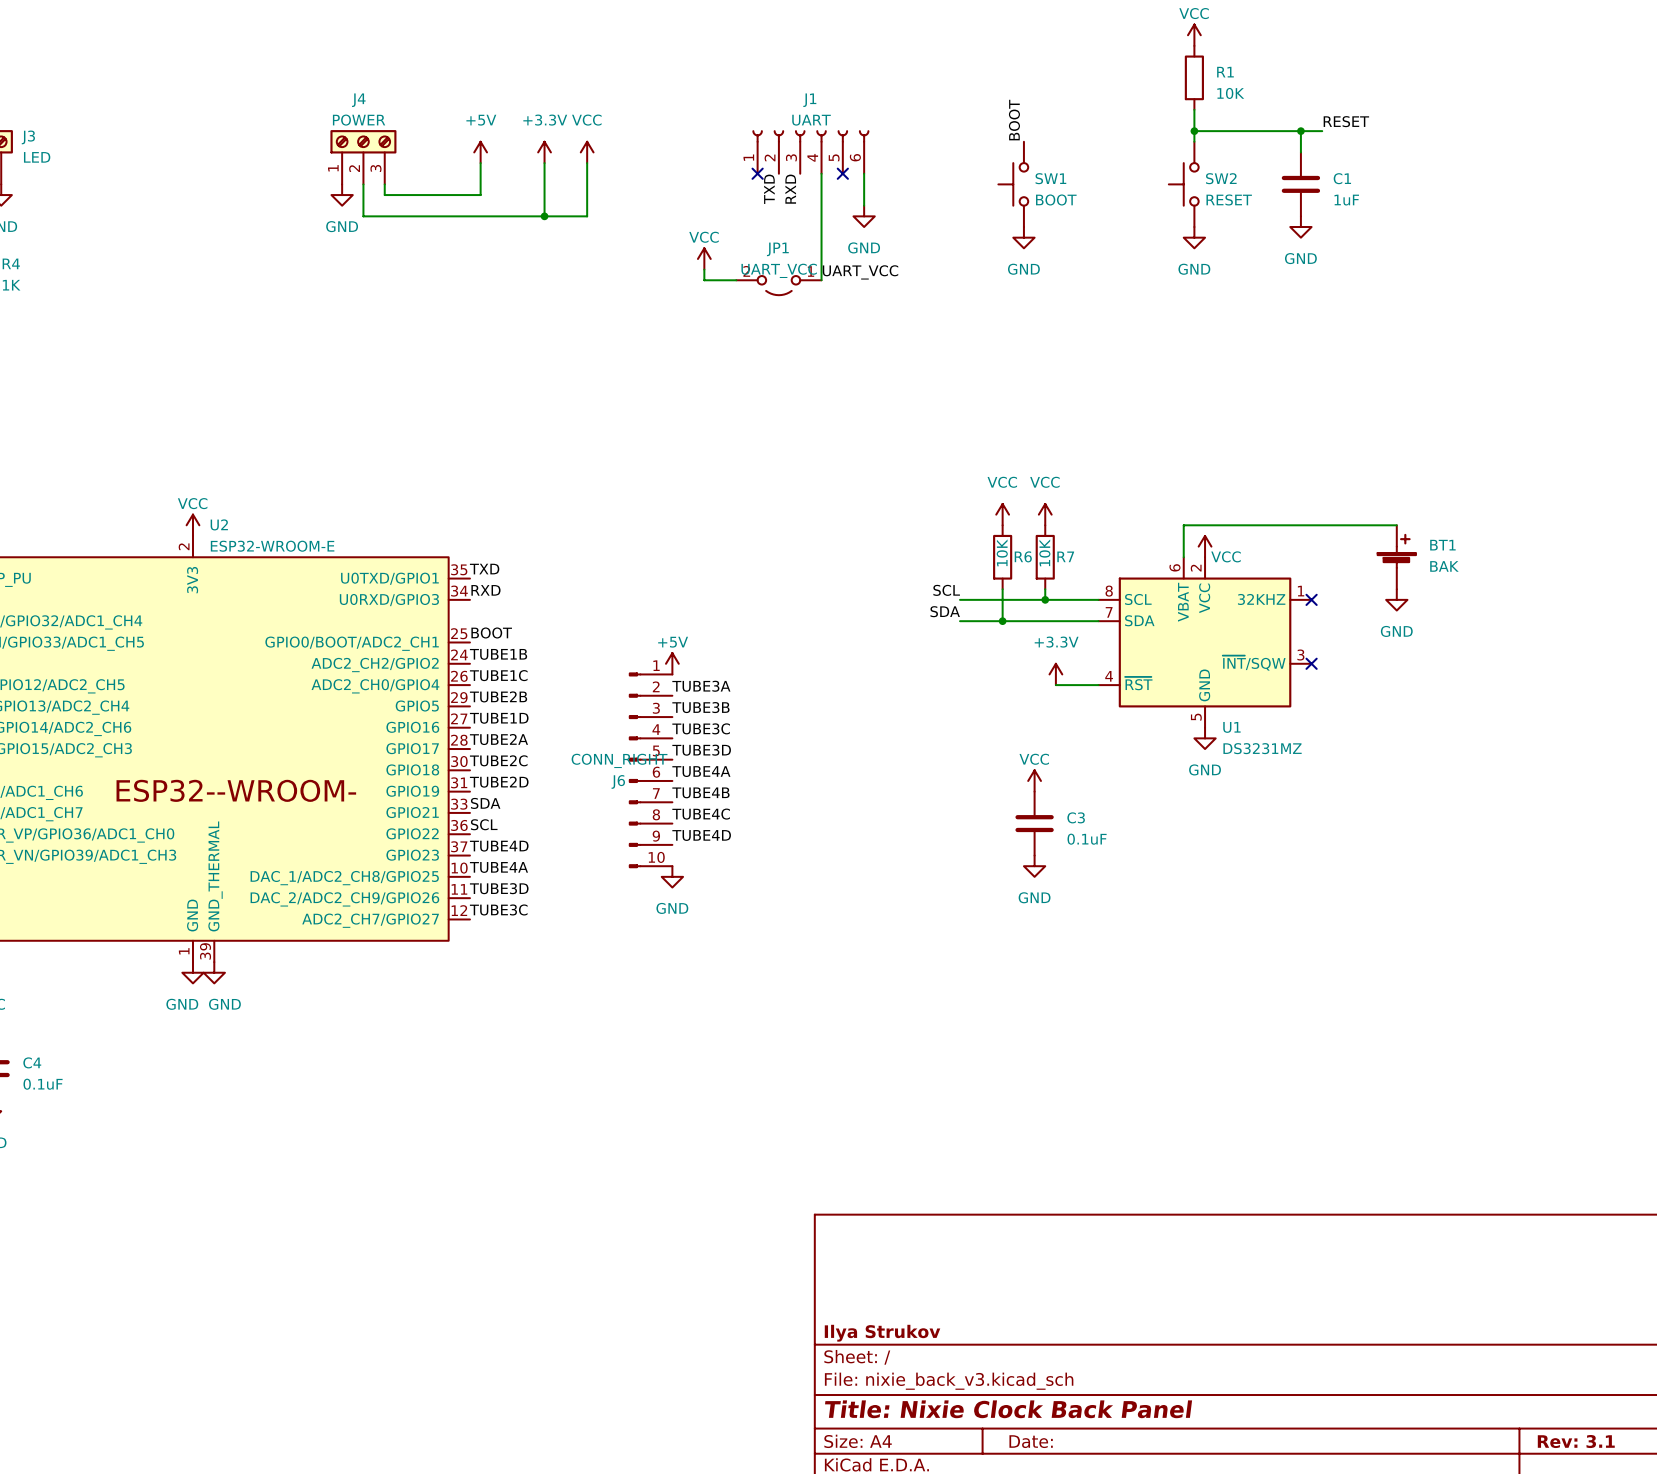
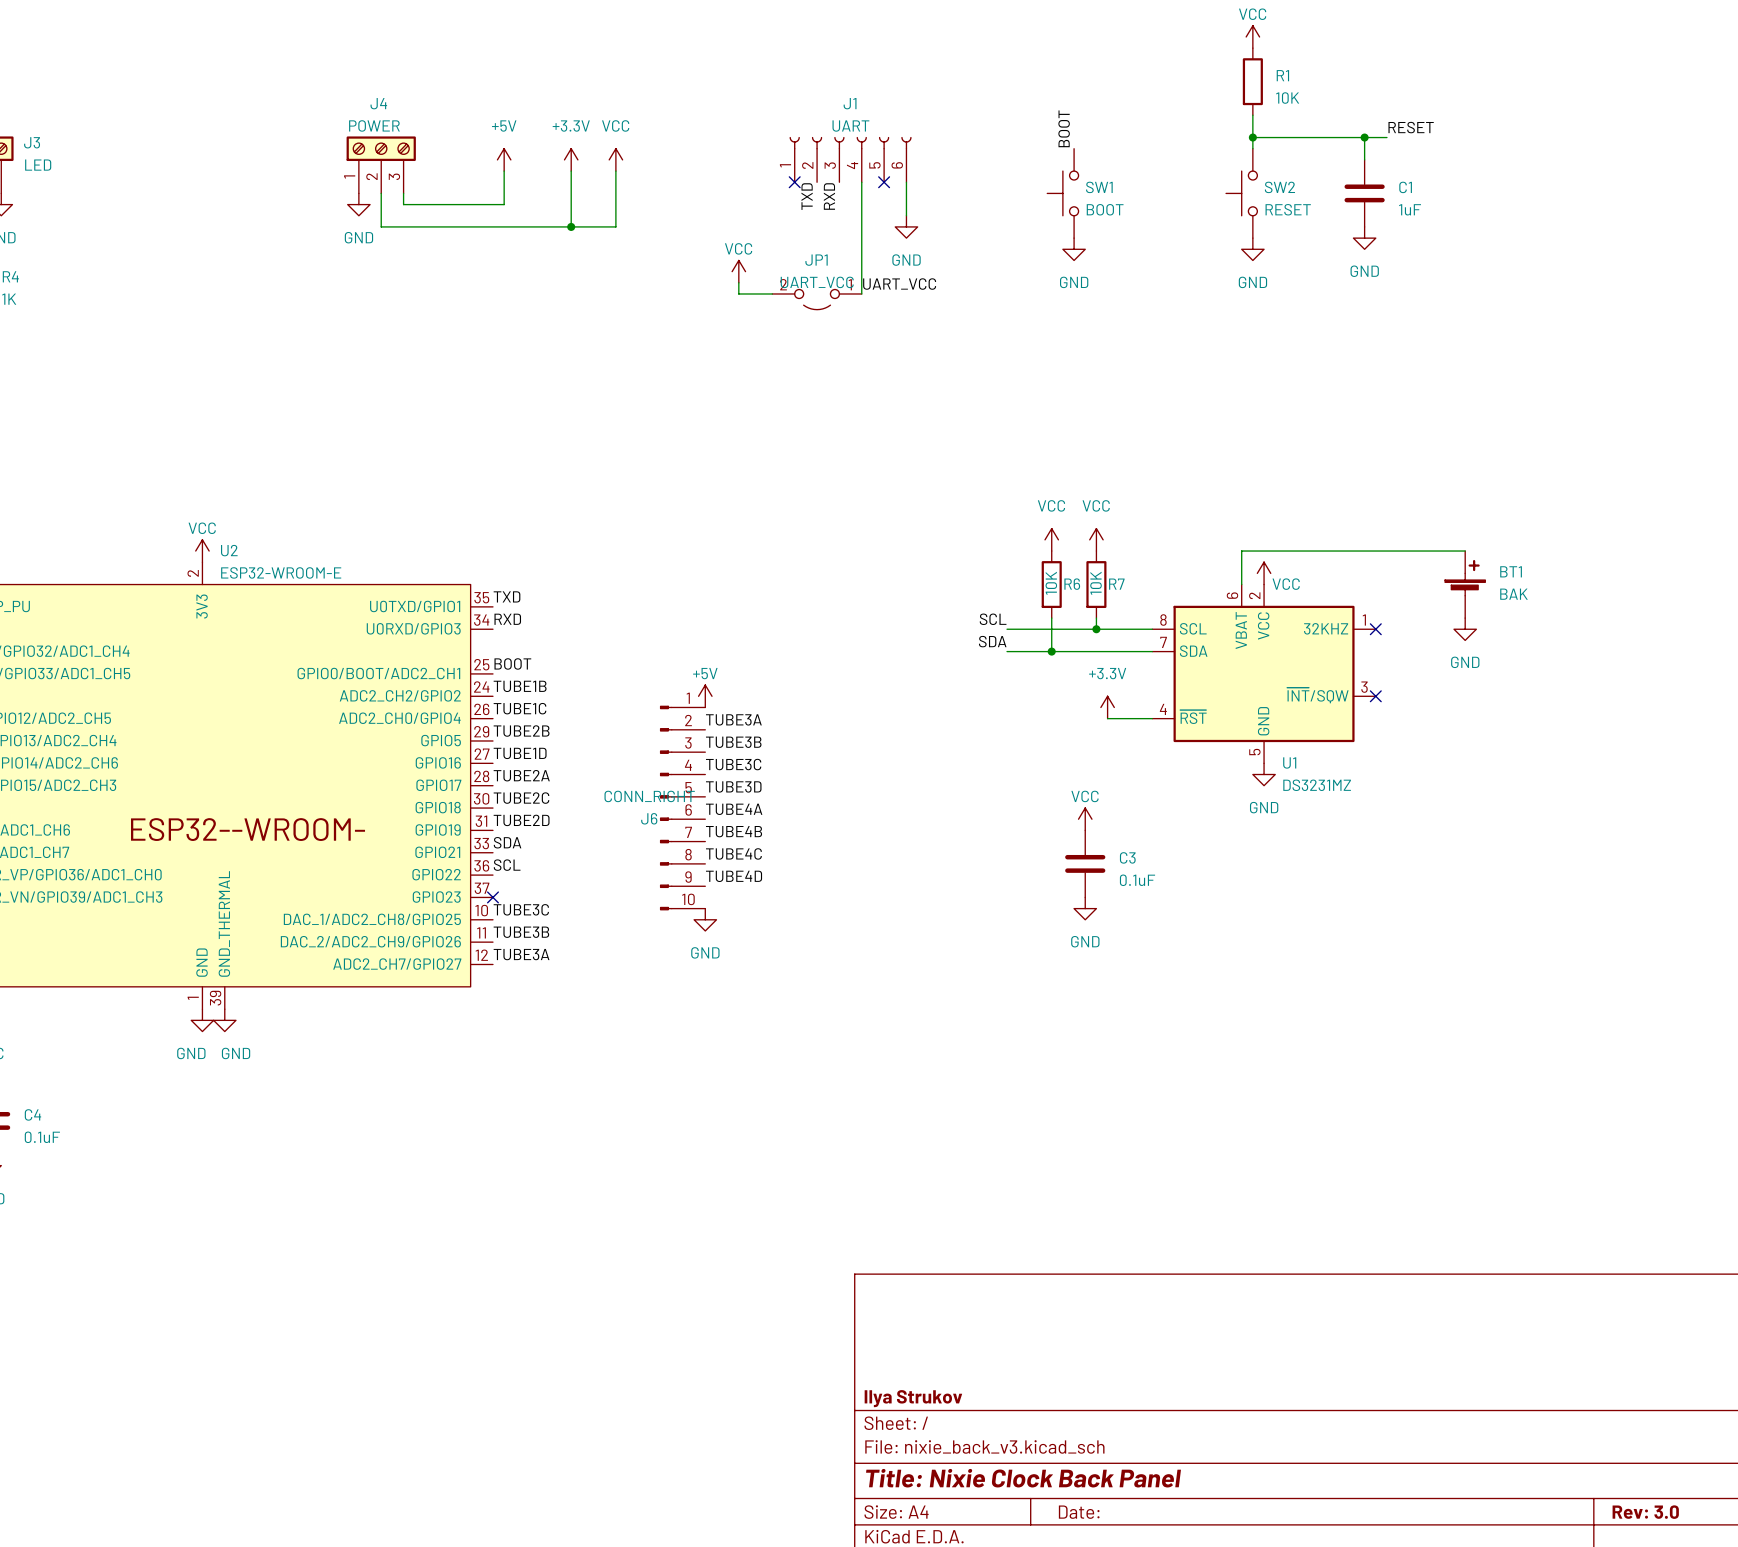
label: TUBE4D (499, 846) -> none
no-connect mark: none -> (492, 897)
label: TUBE4A (498, 867) -> TUBE3C (521, 909)
label: TUBE3D (499, 888) -> TUBE3B (521, 932)
label: TUBE3C (498, 909) -> TUBE3A (521, 954)
title block: Rev: 3.1 (1576, 1441) -> Rev: 3.0 (1645, 1512)

